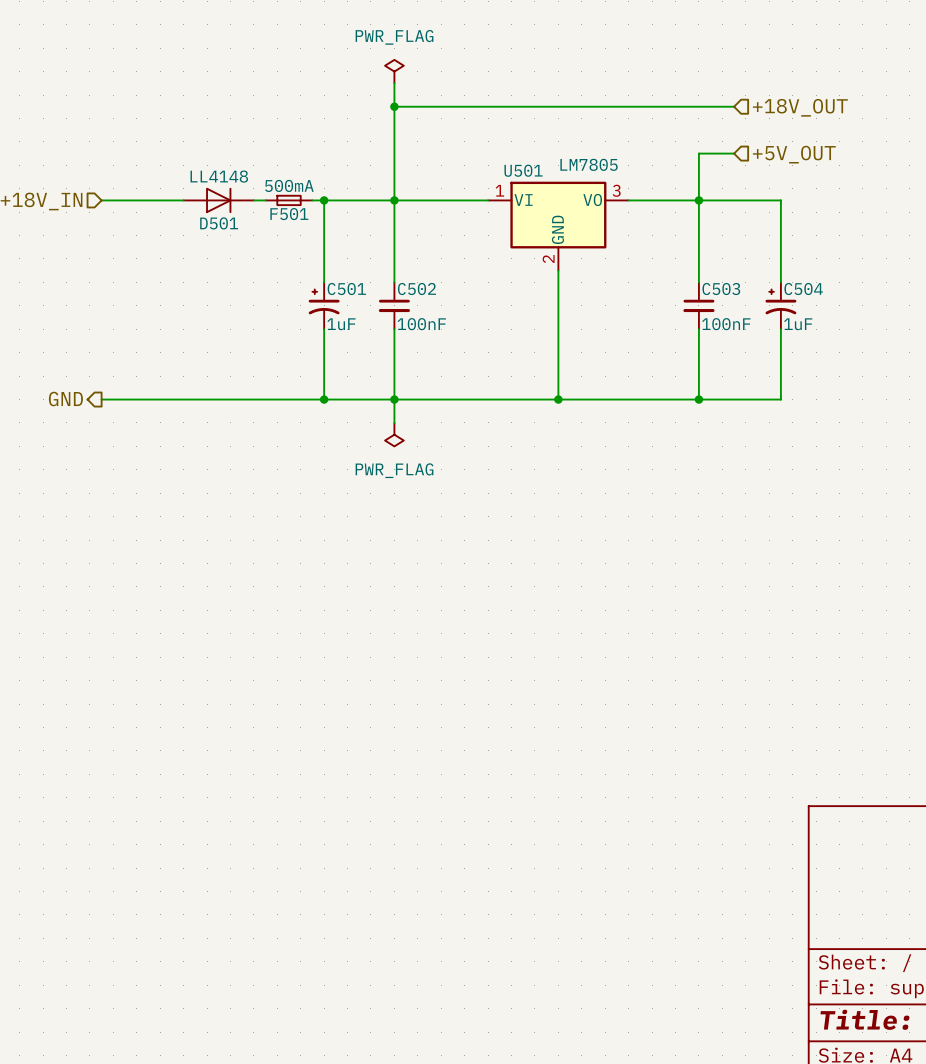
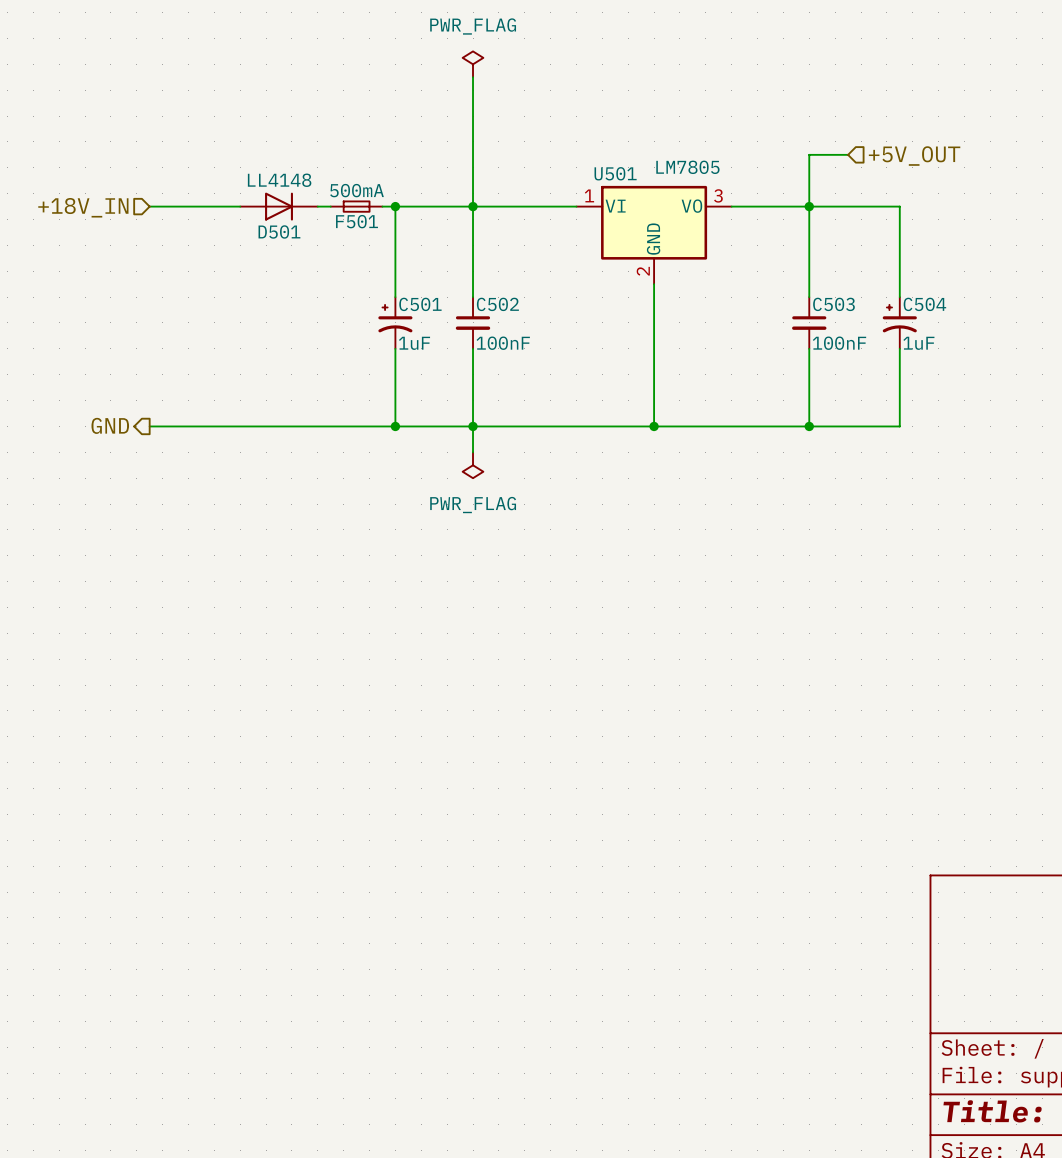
wire: (394, 106) (734, 106) -> none
junction: (394, 106) -> none
hierarchical label: +18V_OUT (800, 107) -> none

